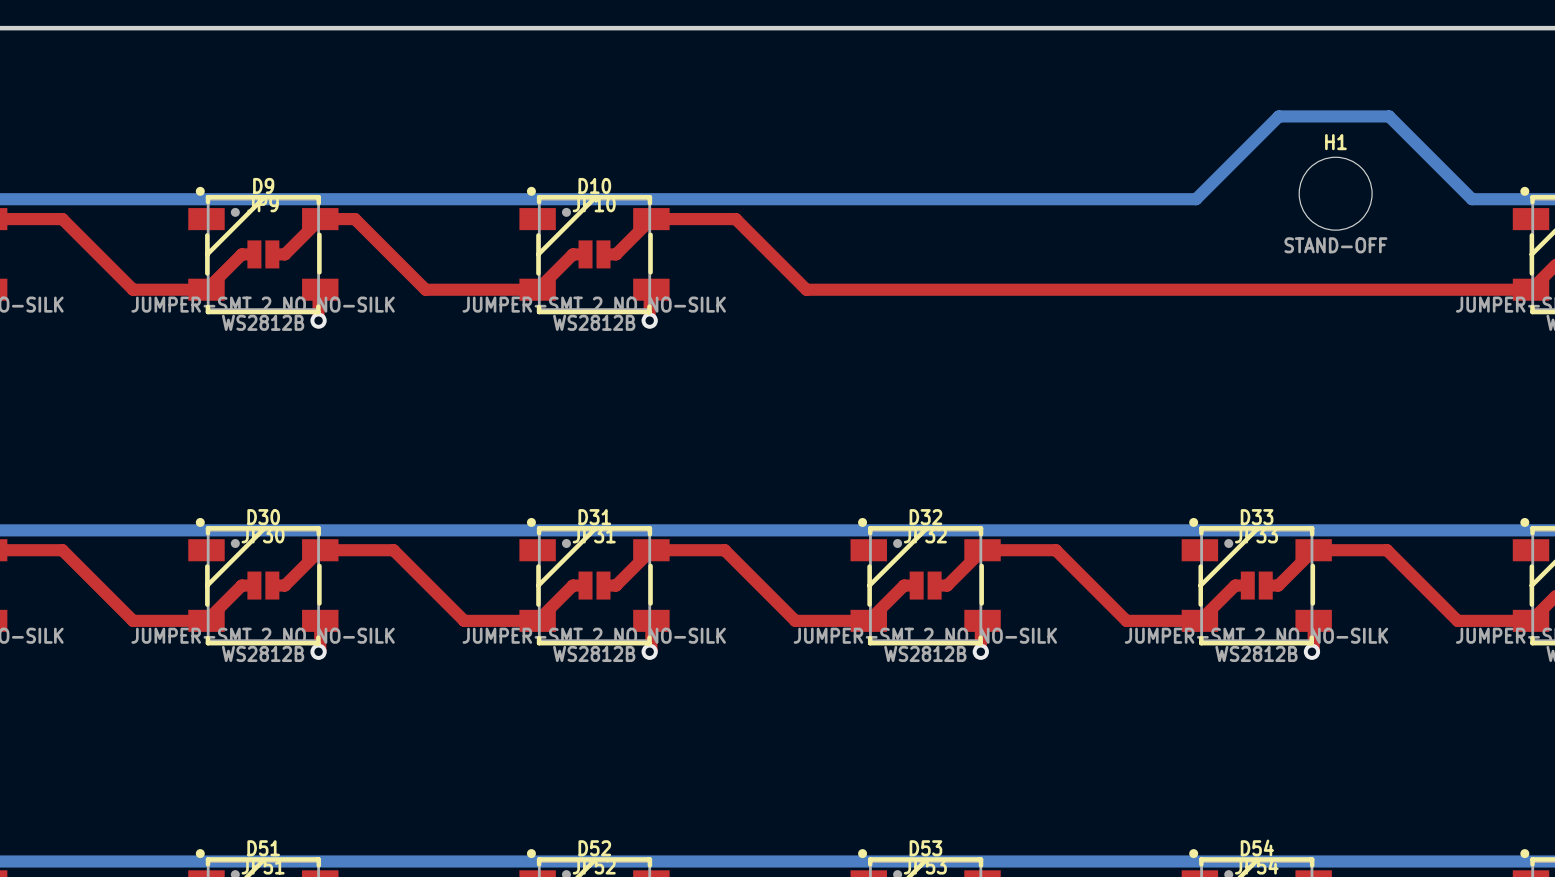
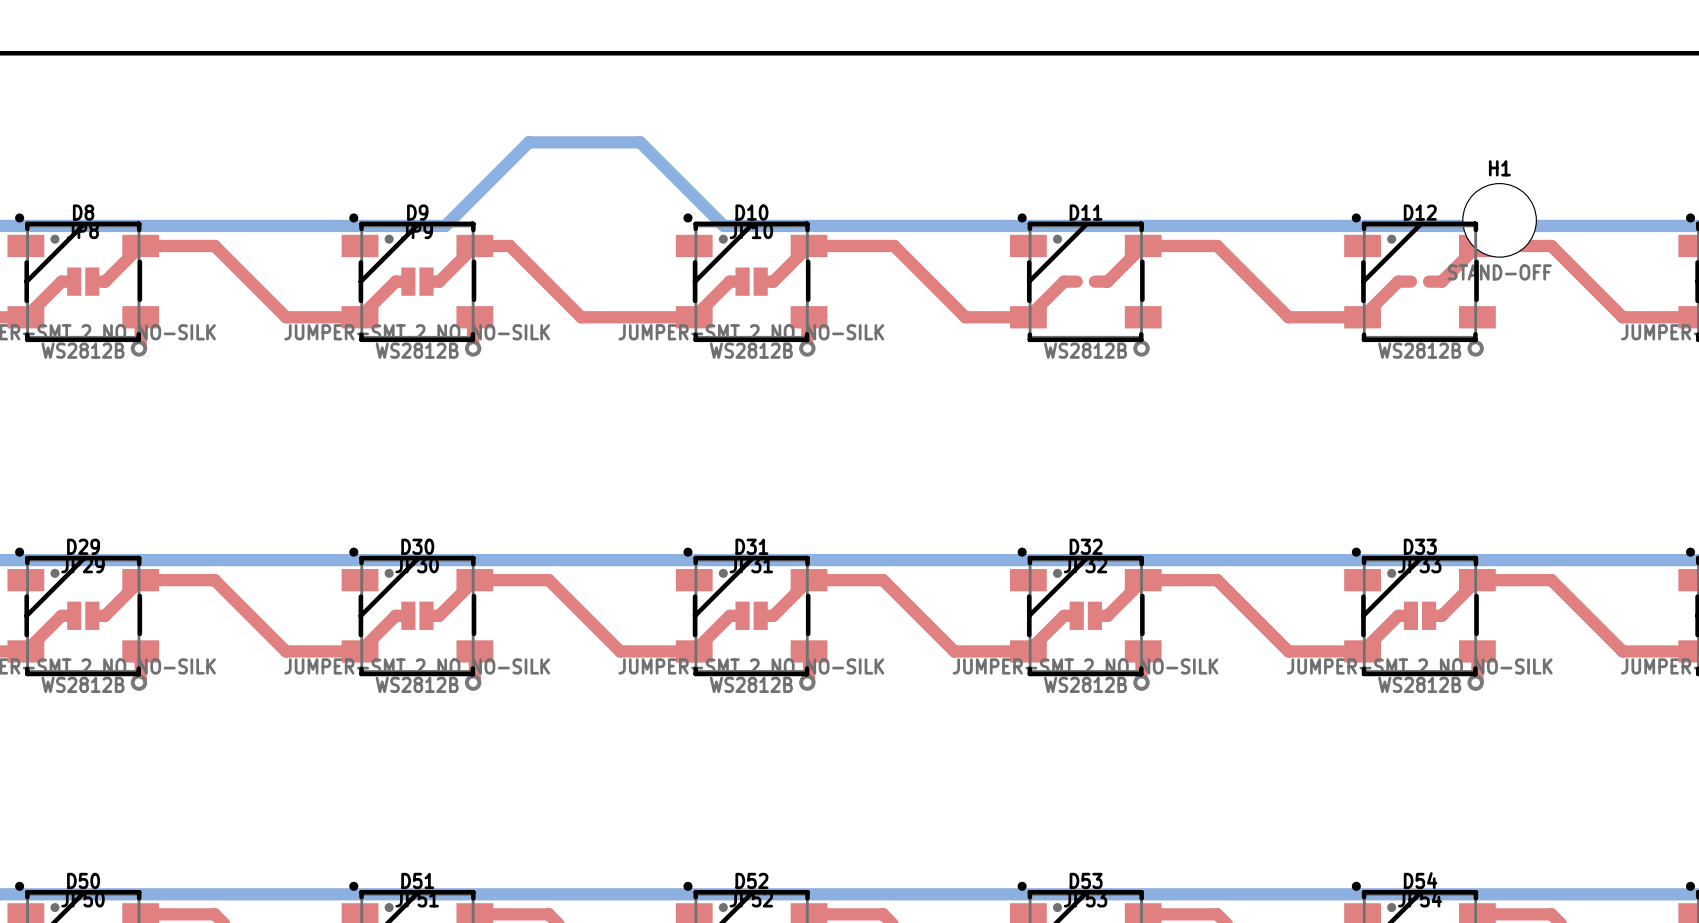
bottom track: (290, 199) (566, 199) -> (445, 225) (528, 142) (640, 142) (723, 225)
bottom track: (1196, 199) (1278, 116) (1389, 116) (1472, 199) -> (1358, 225) (1637, 225)
D11: none -> WS2812B (1085, 277)
D12: none -> WS2812B (1419, 277)
top track: none -> (1076, 281) (1064, 281) (1028, 317)
top track: none -> (1410, 281) (1398, 281) (1362, 317)
top track: (868, 289) (1126, 289) -> (1094, 281) (1107, 281) (1143, 245) (1217, 245) (1288, 317)
top track: (1199, 289) (1457, 289) -> (1429, 281) (1441, 281) (1477, 245) (1551, 245) (1622, 317)
via: none -> (1141, 348)
via: none -> (1475, 348)

